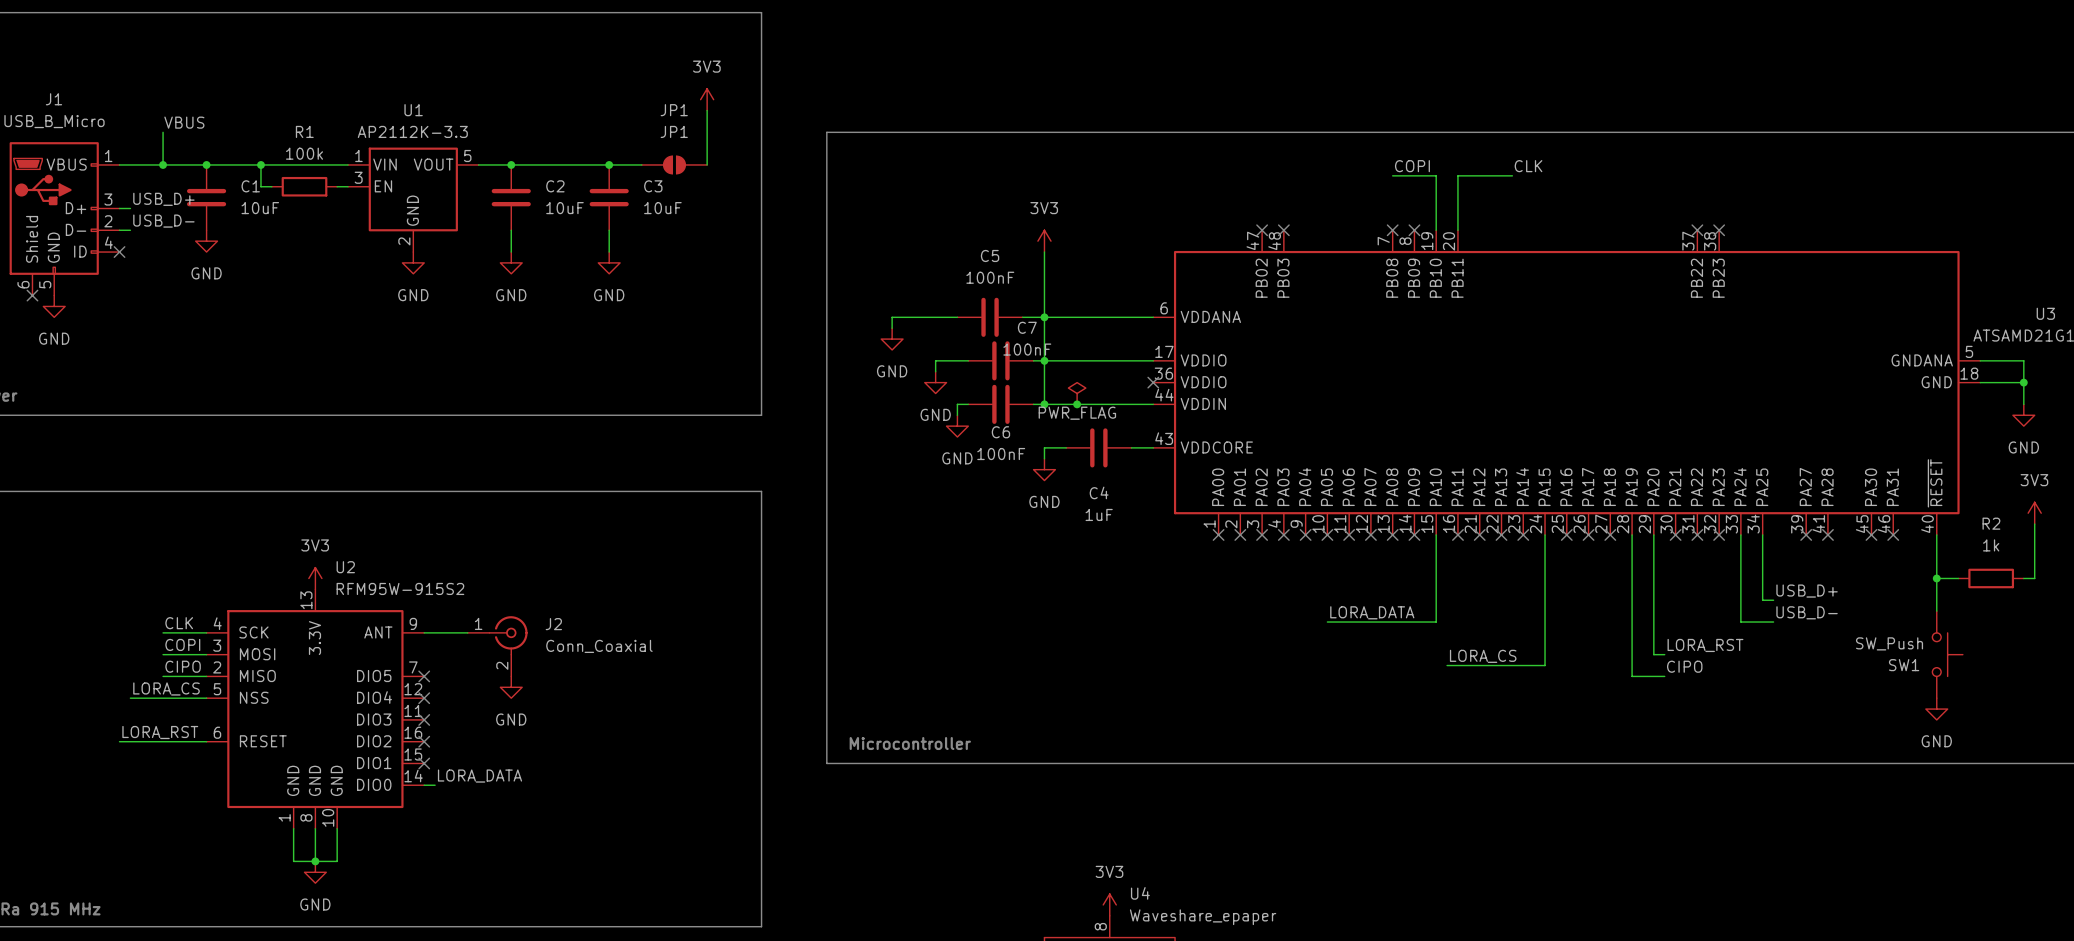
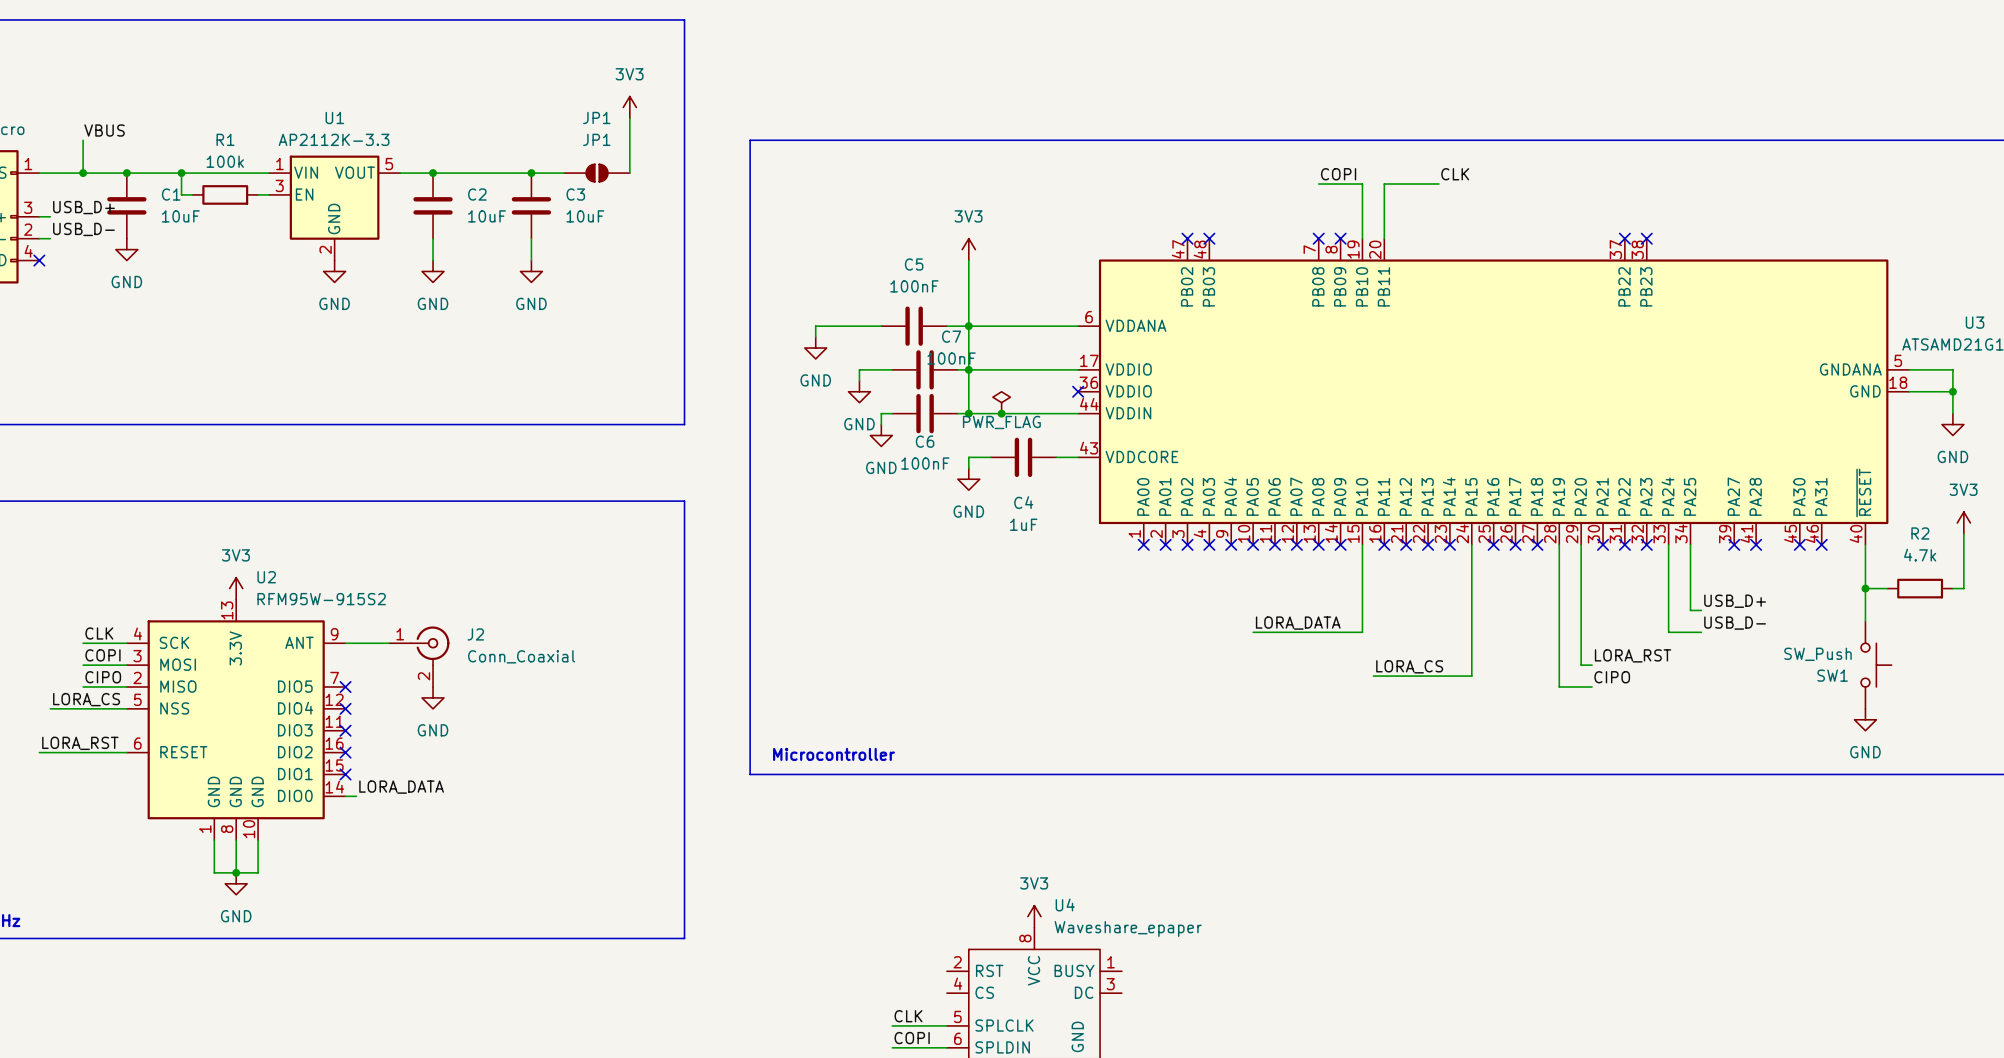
R2 value: 1k (1991, 545) -> 4.7k (1920, 555)

